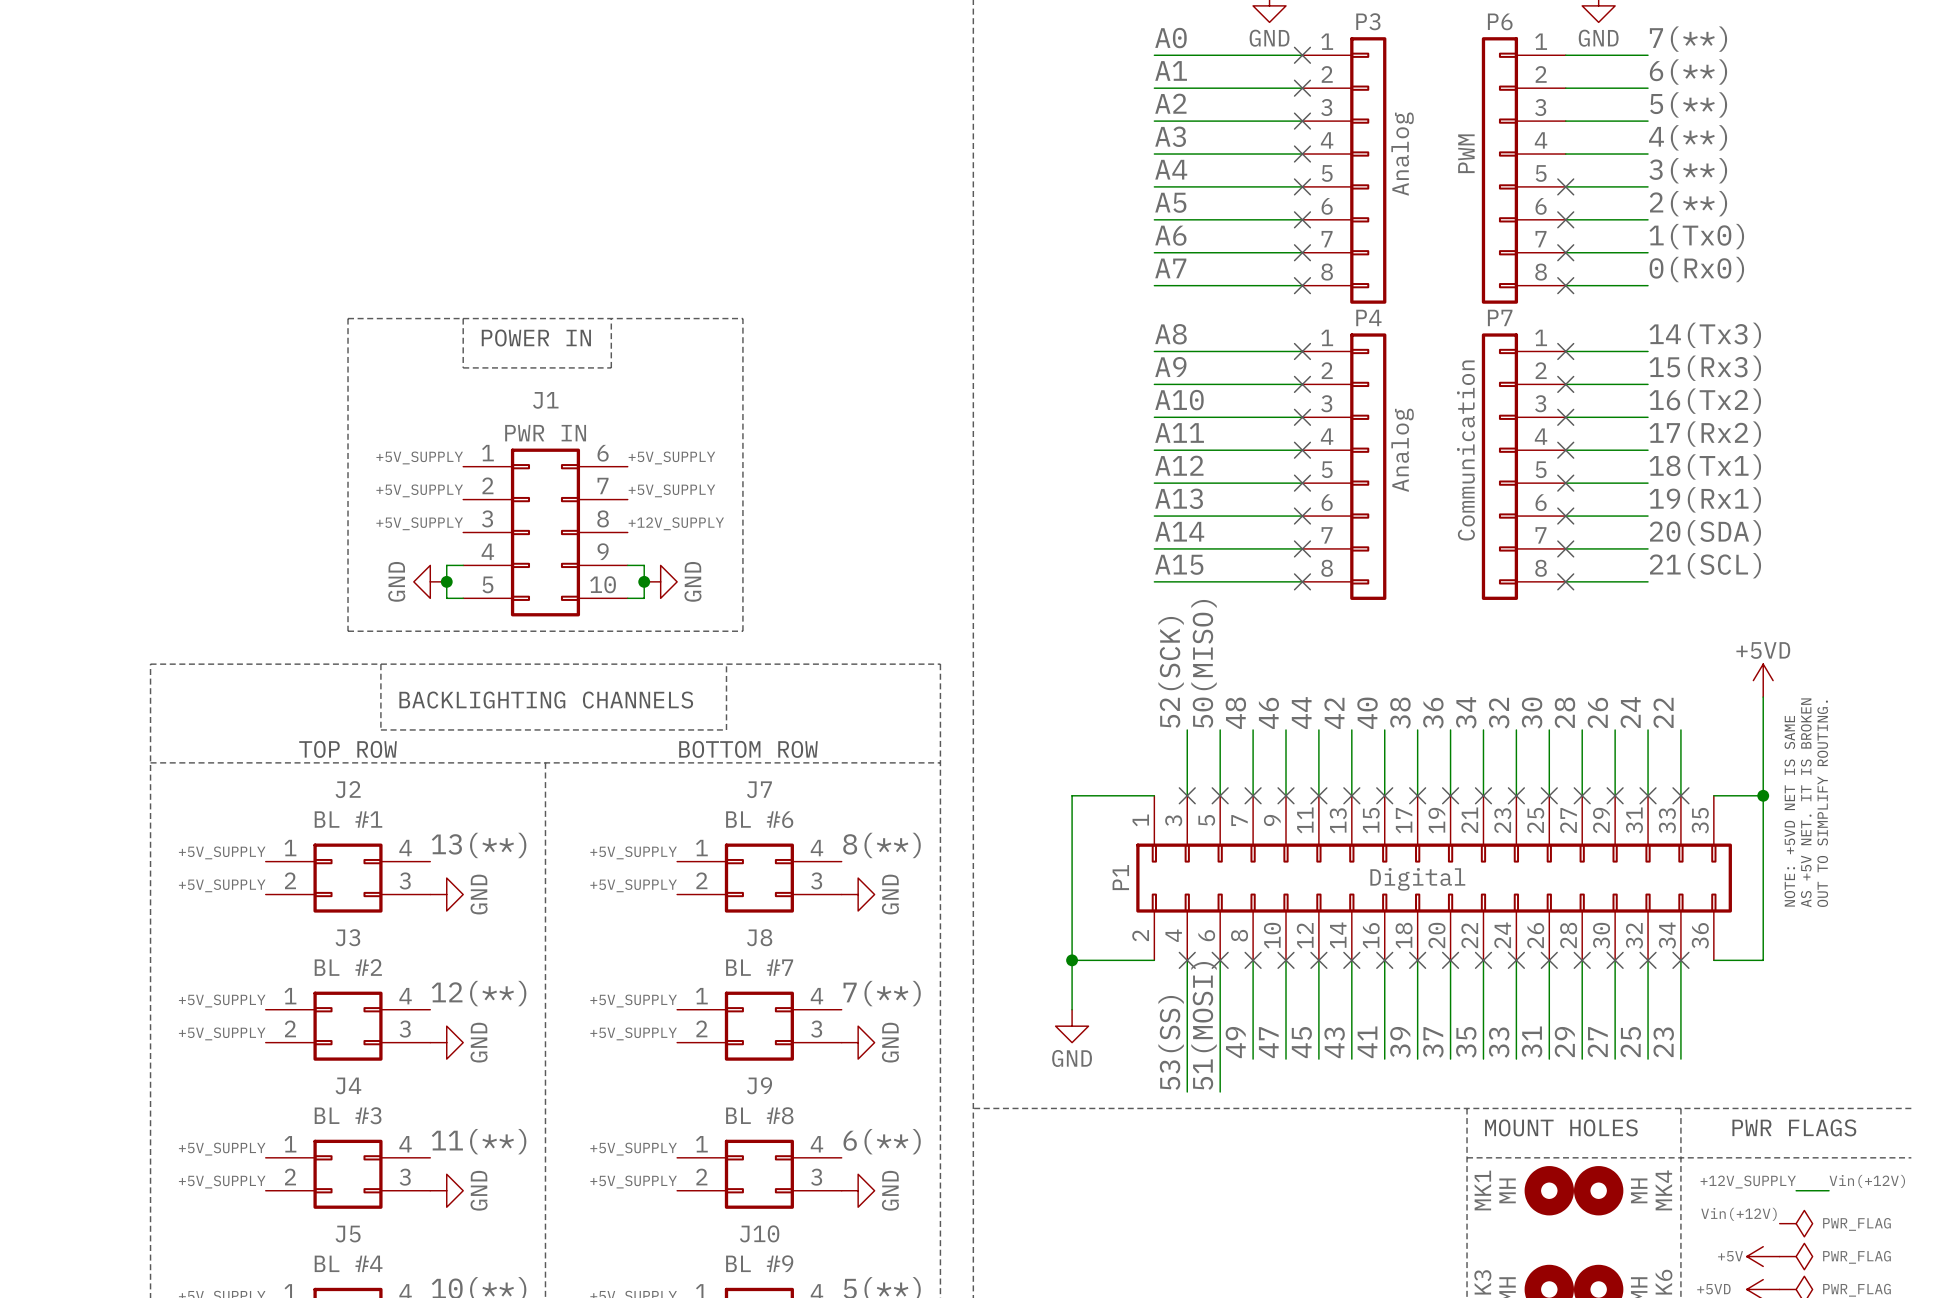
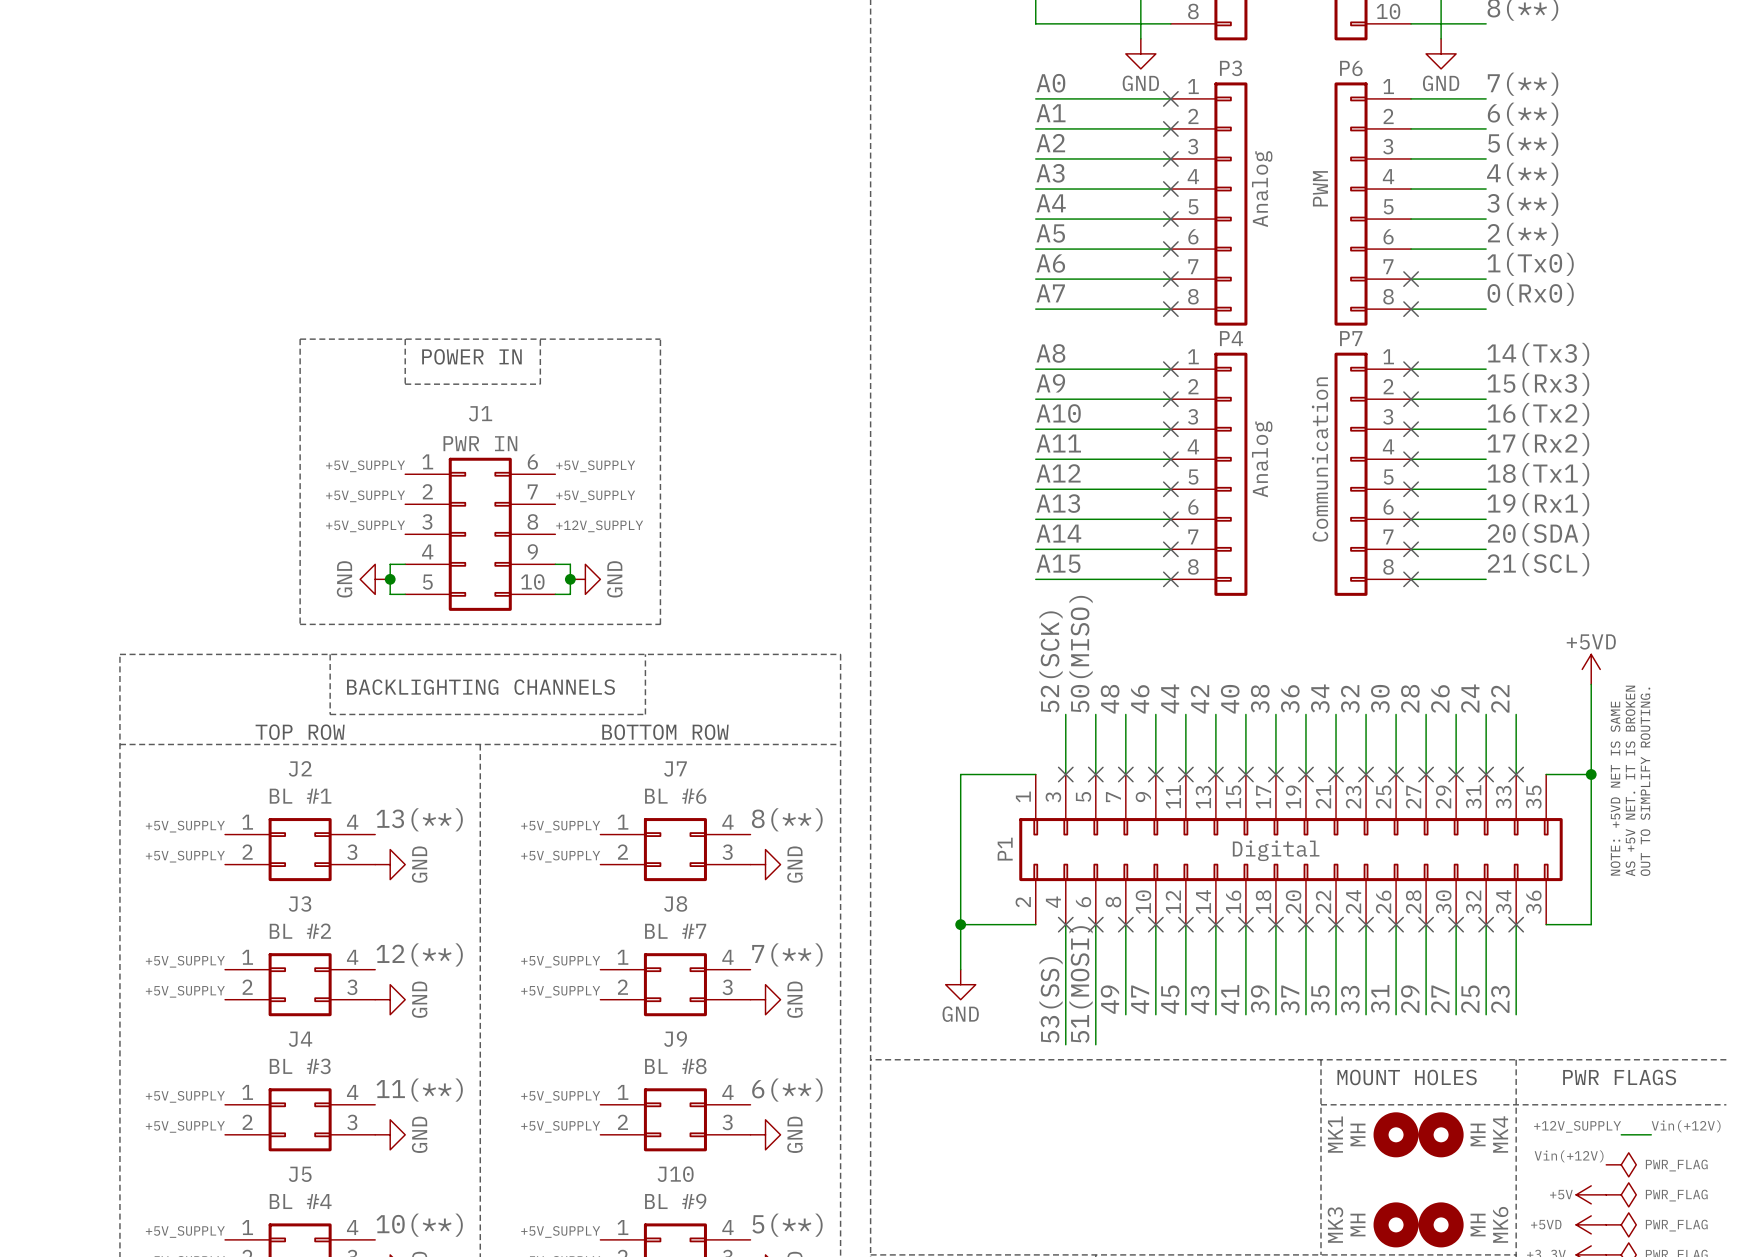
no-connect mark: (1565, 186) -> none
no-connect mark: (1565, 219) -> none

